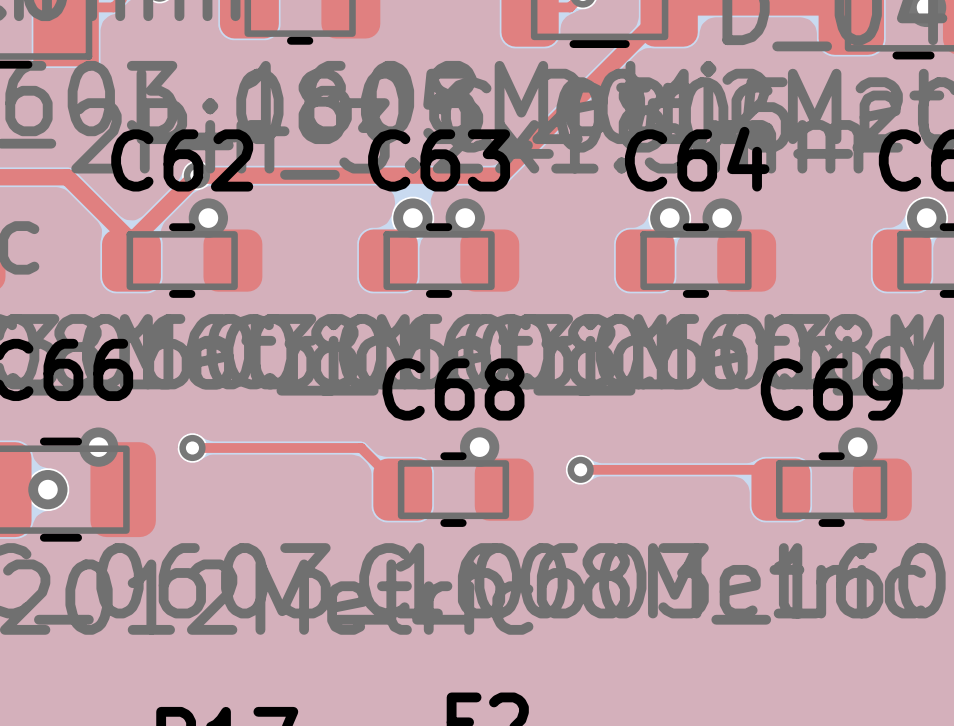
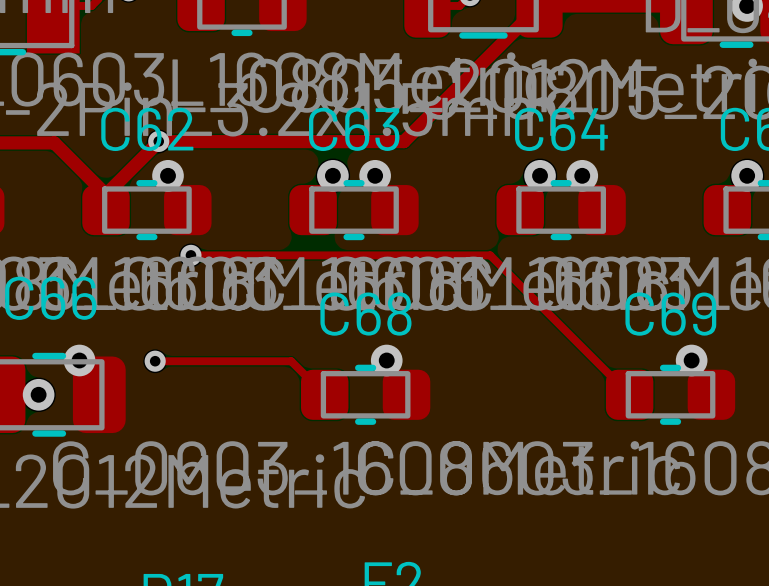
top track: (580, 469) (761, 469) -> (190, 255) (490, 255) (613, 378)
via position: (580, 469) -> (190, 255)

